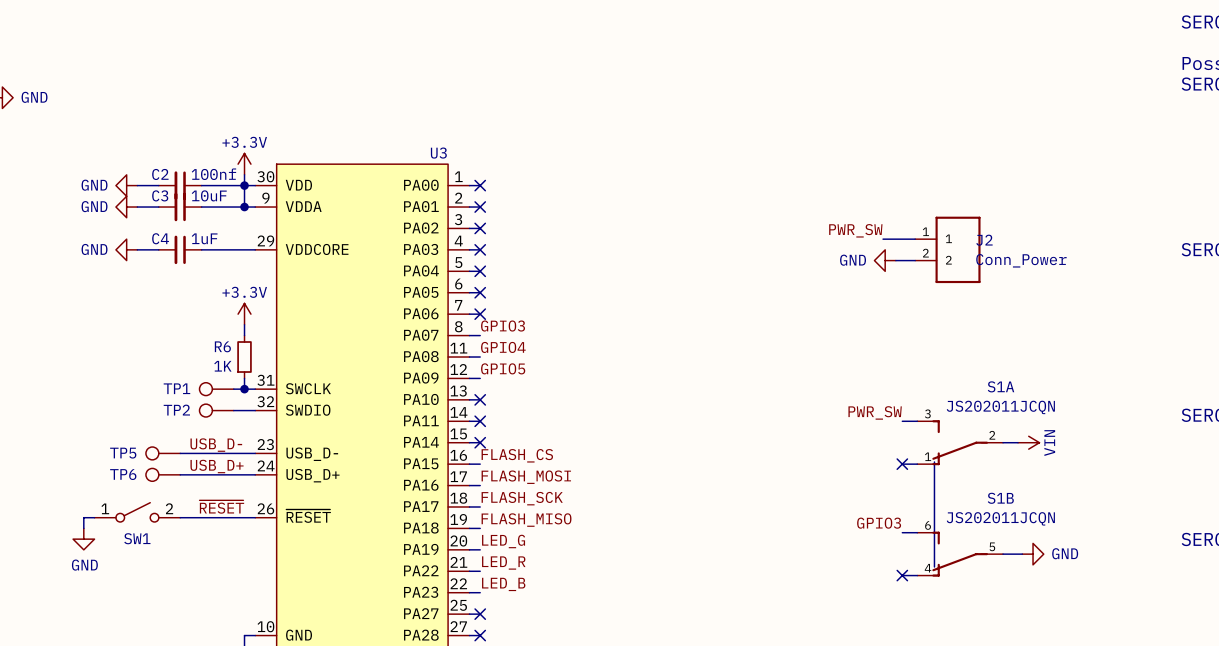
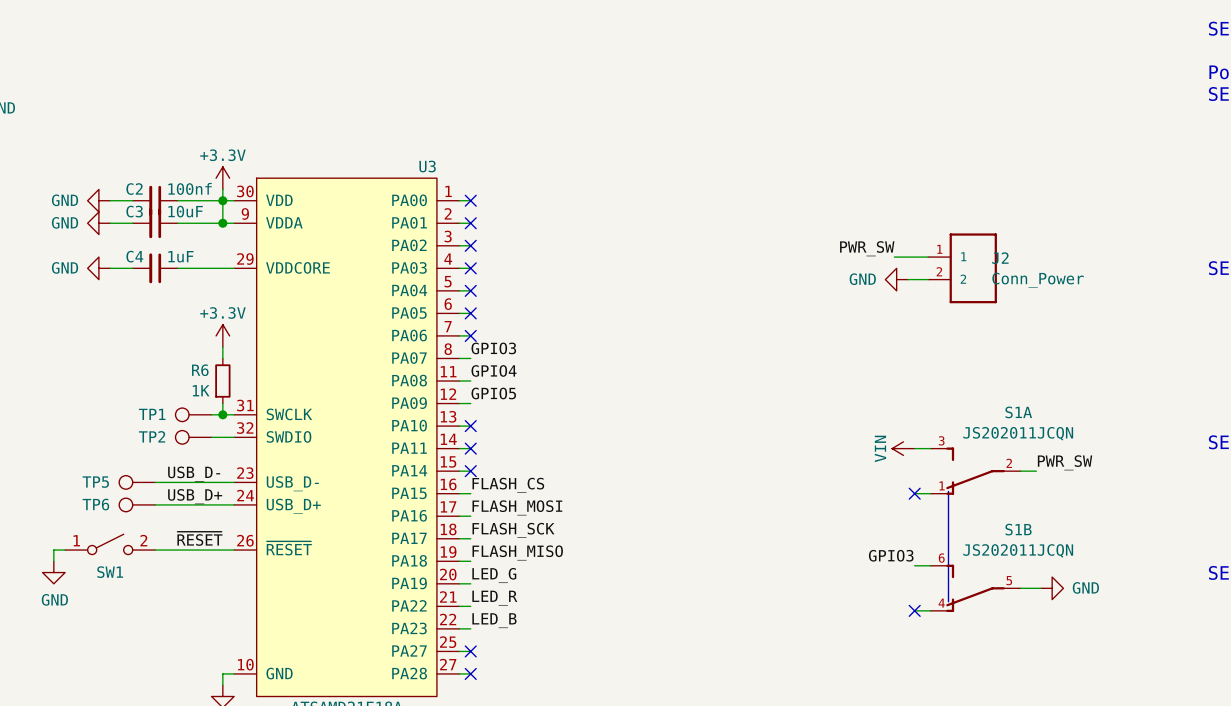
label position: PWR_SW (875, 412) -> PWR_SW (1065, 462)
power symbol rotation: 0° (1028, 442) -> 180° (903, 448)
power symbol position: VIN (1028, 442) -> VIN (903, 448)

